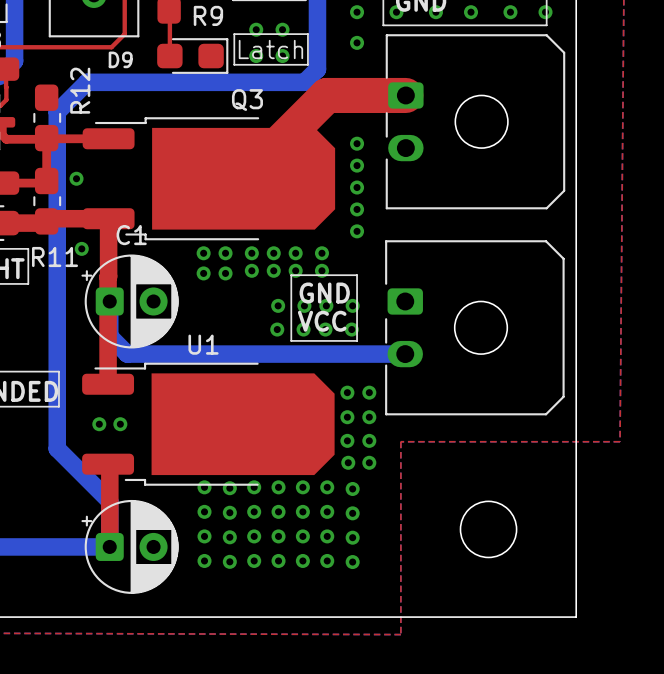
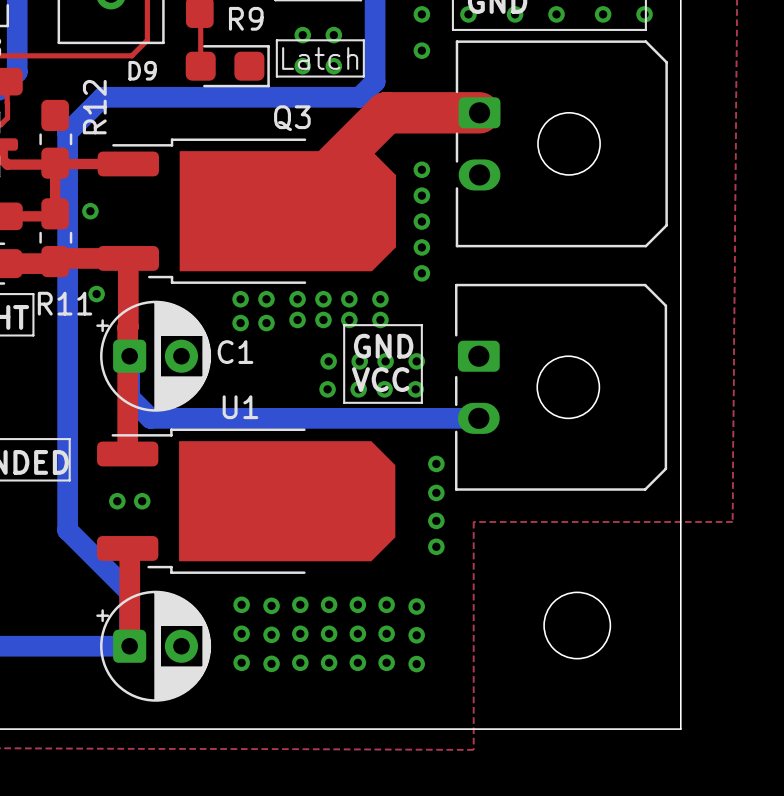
C1 name position: C1 (131, 235) -> C1 (235, 352)
via: (347, 392) -> none
via: (347, 417) -> none
via: (347, 440) -> none
via: (348, 462) -> none
via: (204, 487) -> none
via: (254, 487) -> none
via: (278, 487) -> none
via: (302, 487) -> none
via: (327, 487) -> none
via: (229, 488) -> none
via: (352, 488) -> none

